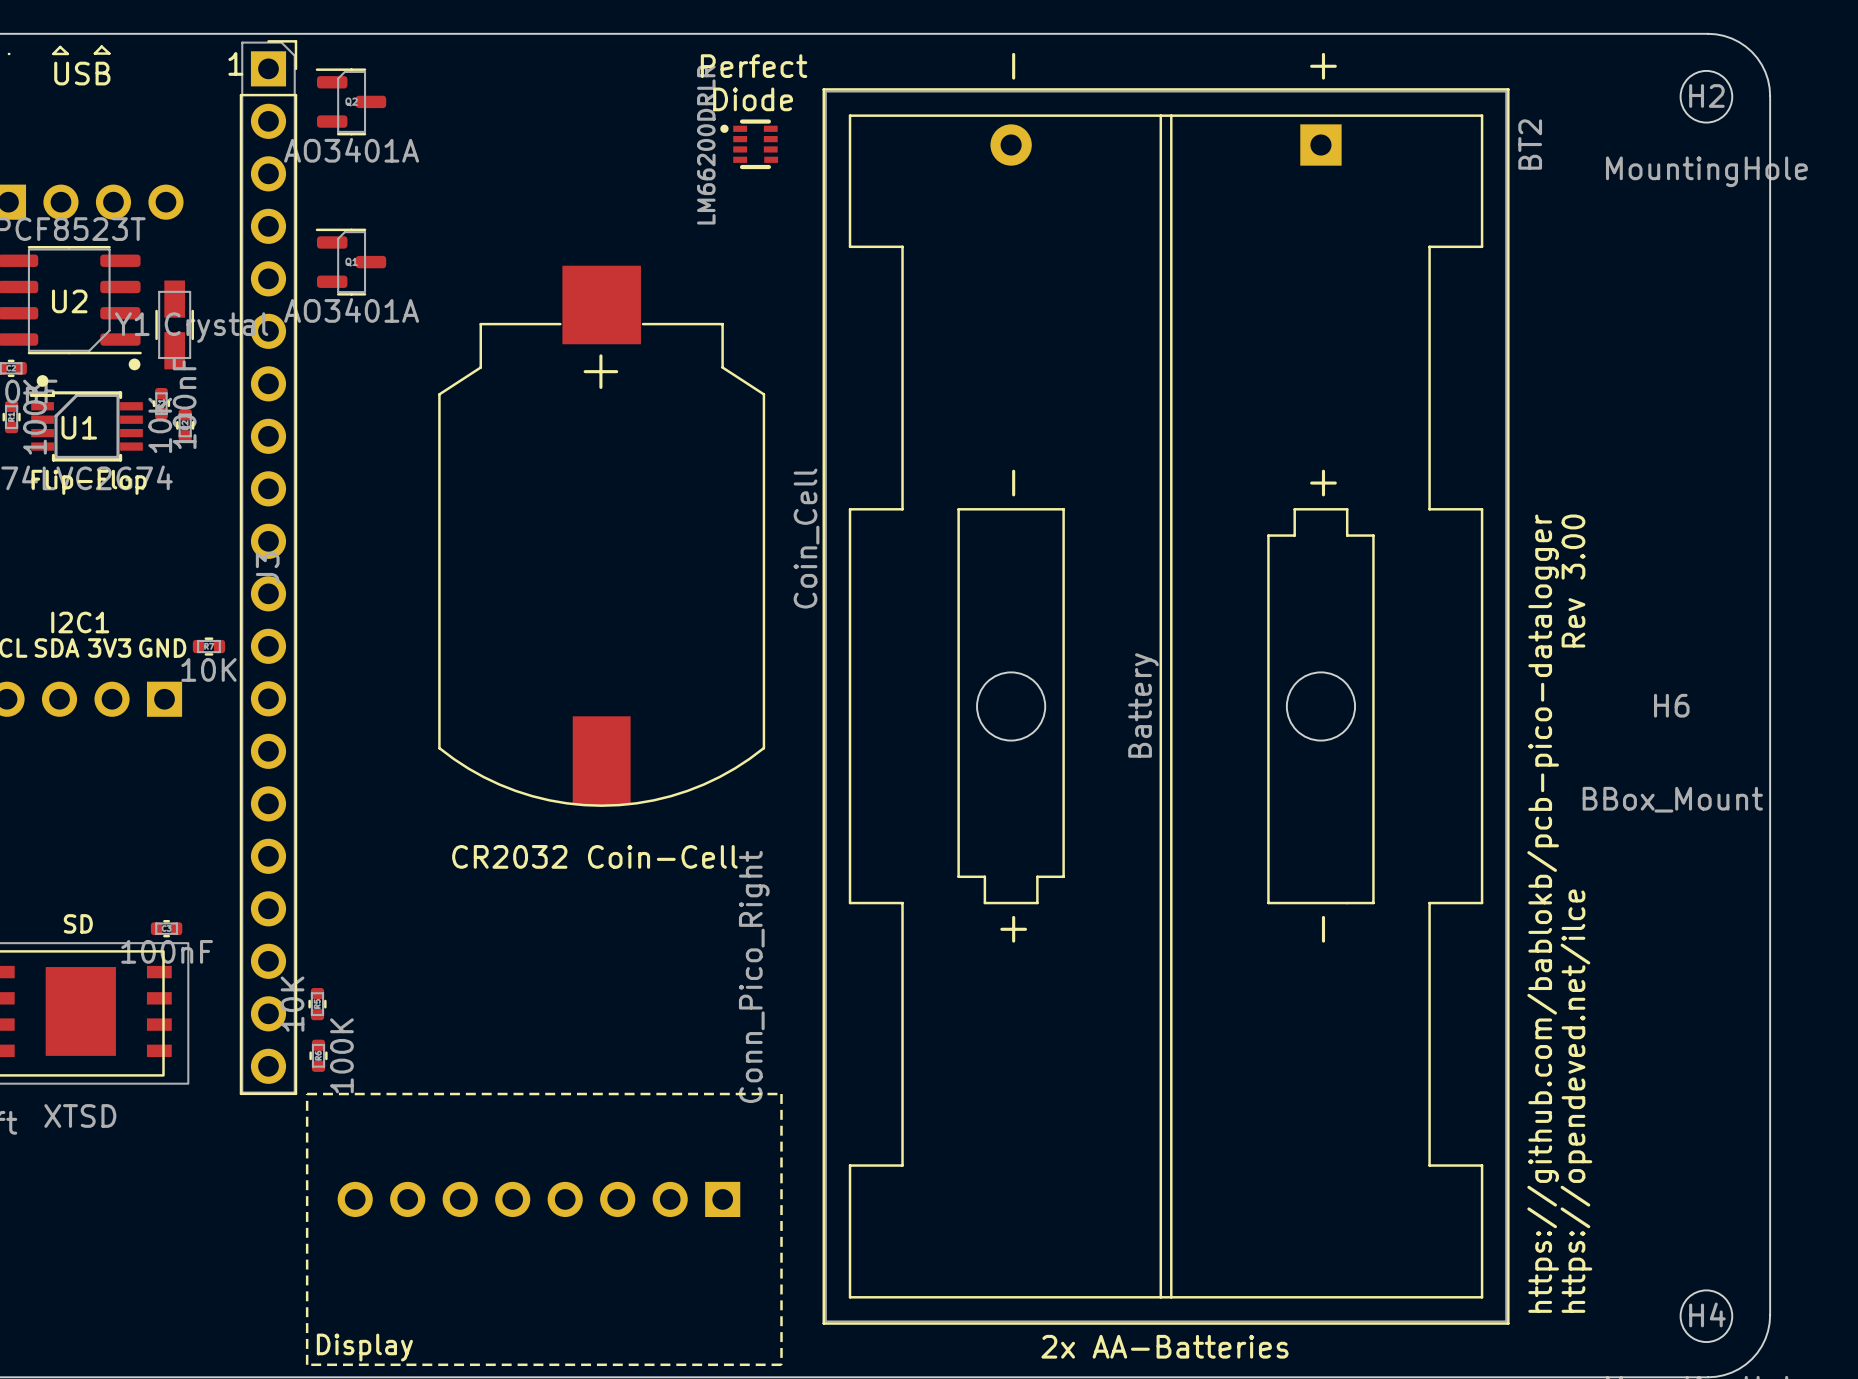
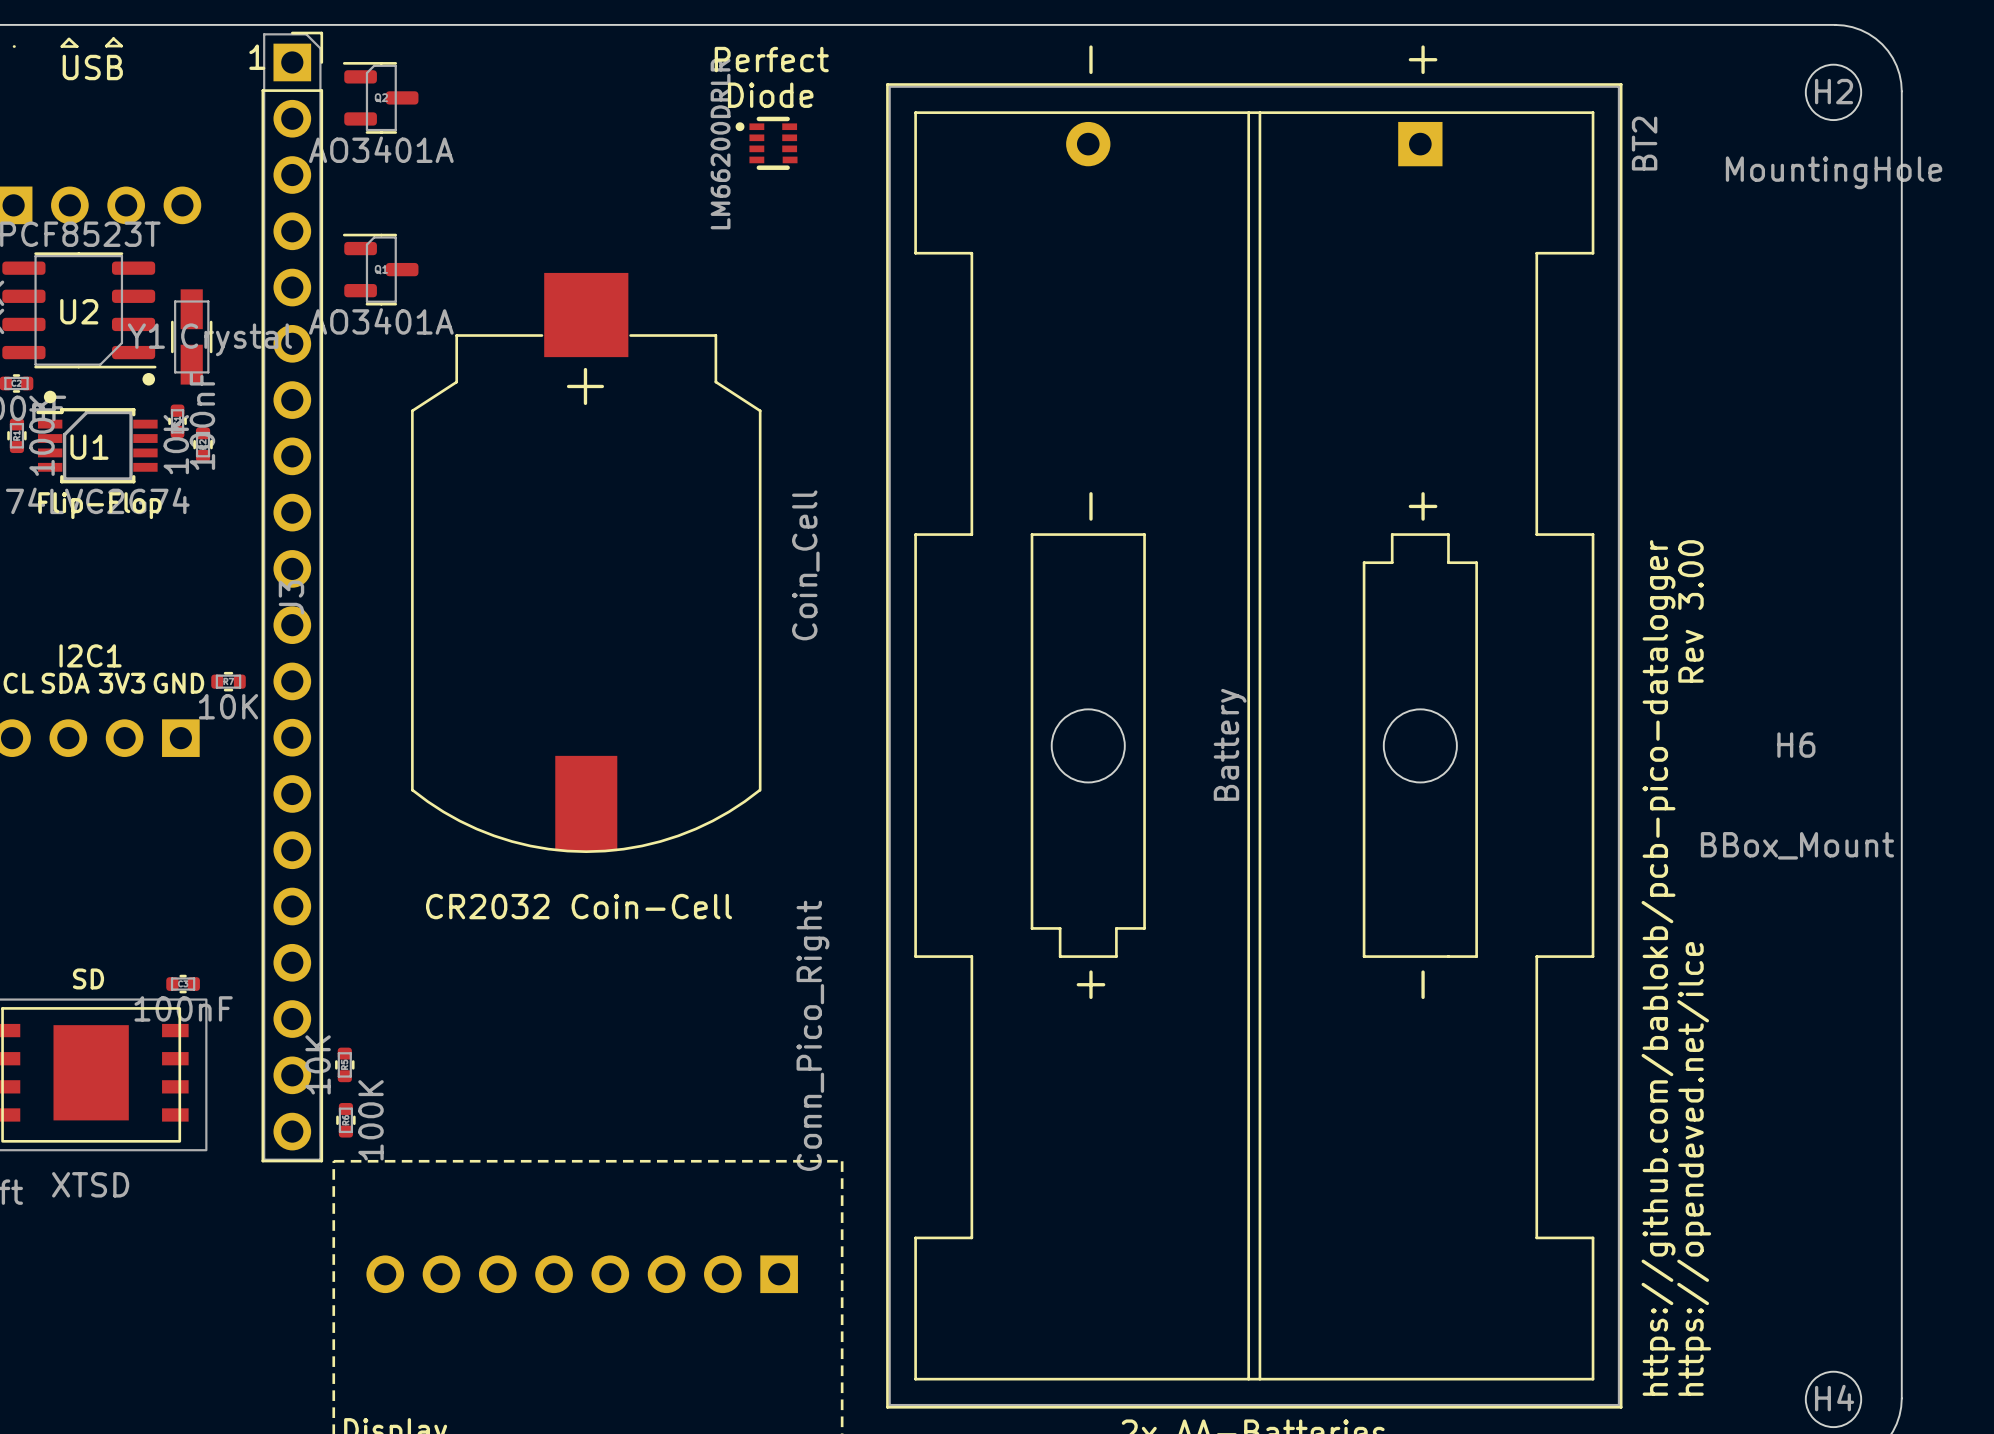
text position: Perfect (754, 66) -> Perfect (771, 59)
text position: Diode (753, 99) -> Diode (770, 95)
part position: (749, 144) -> (766, 143)
part position: (601, 536) -> (586, 562)
text position: CR2032 Coin-Cell (594, 856) -> CR2032 Coin-Cell (579, 906)

